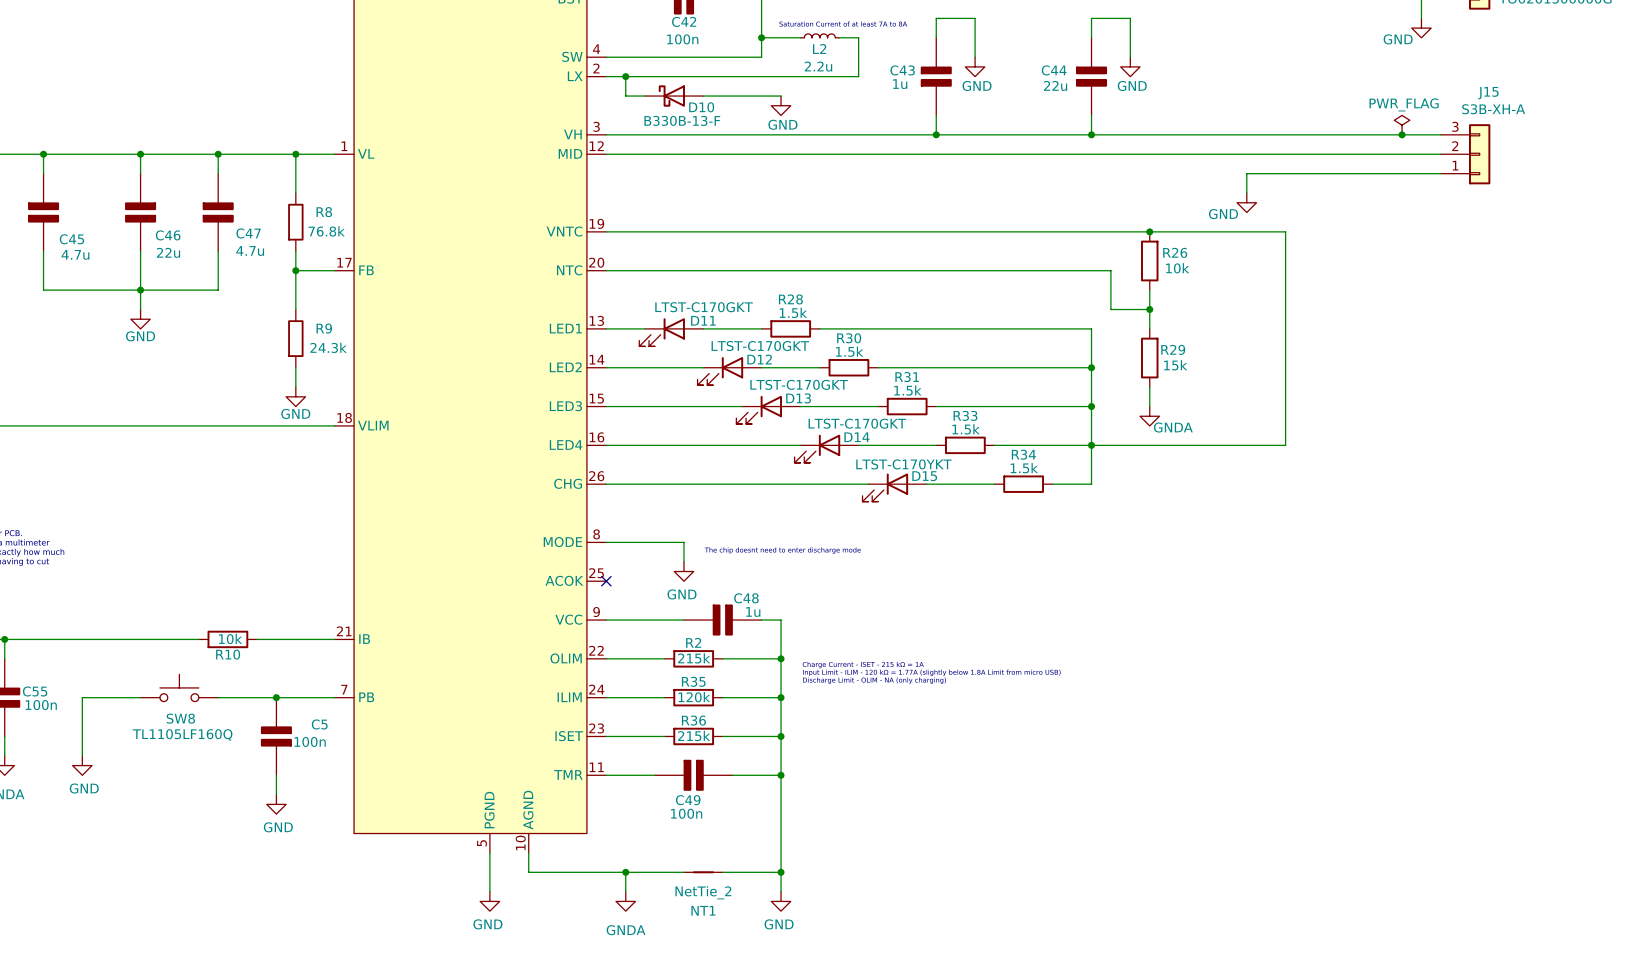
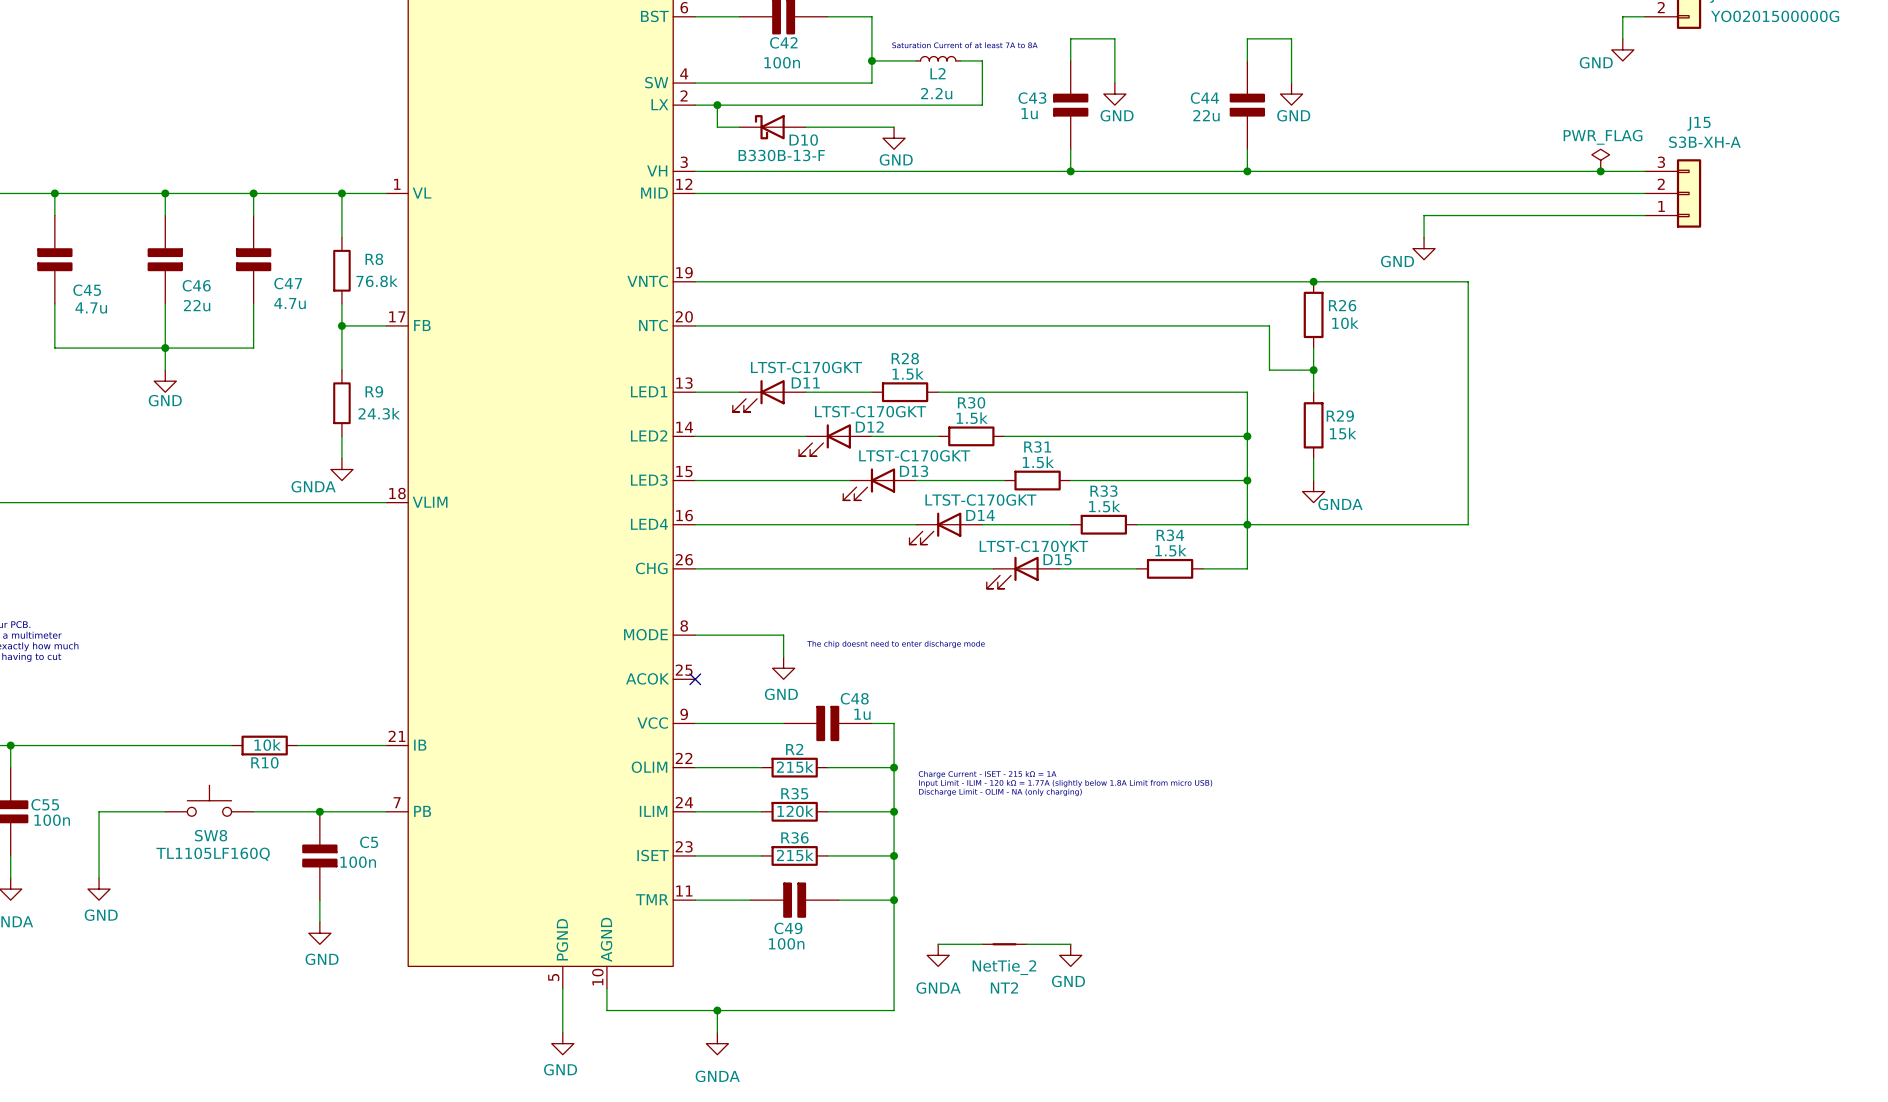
power symbol: GND (295, 396) -> GNDA (341, 469)
wire: none -> (938, 944) (982, 944)
NT2: none -> NetTie_2 (1004, 944)
wire: none -> (1026, 944) (1070, 944)
power symbol: none -> GNDA (938, 955)
NT1: NetTie_2 (703, 872) -> none
wire: (781, 872) (781, 891) -> none
junction: (781, 872) -> none
power symbol position: GND (781, 901) -> GND (1070, 955)

